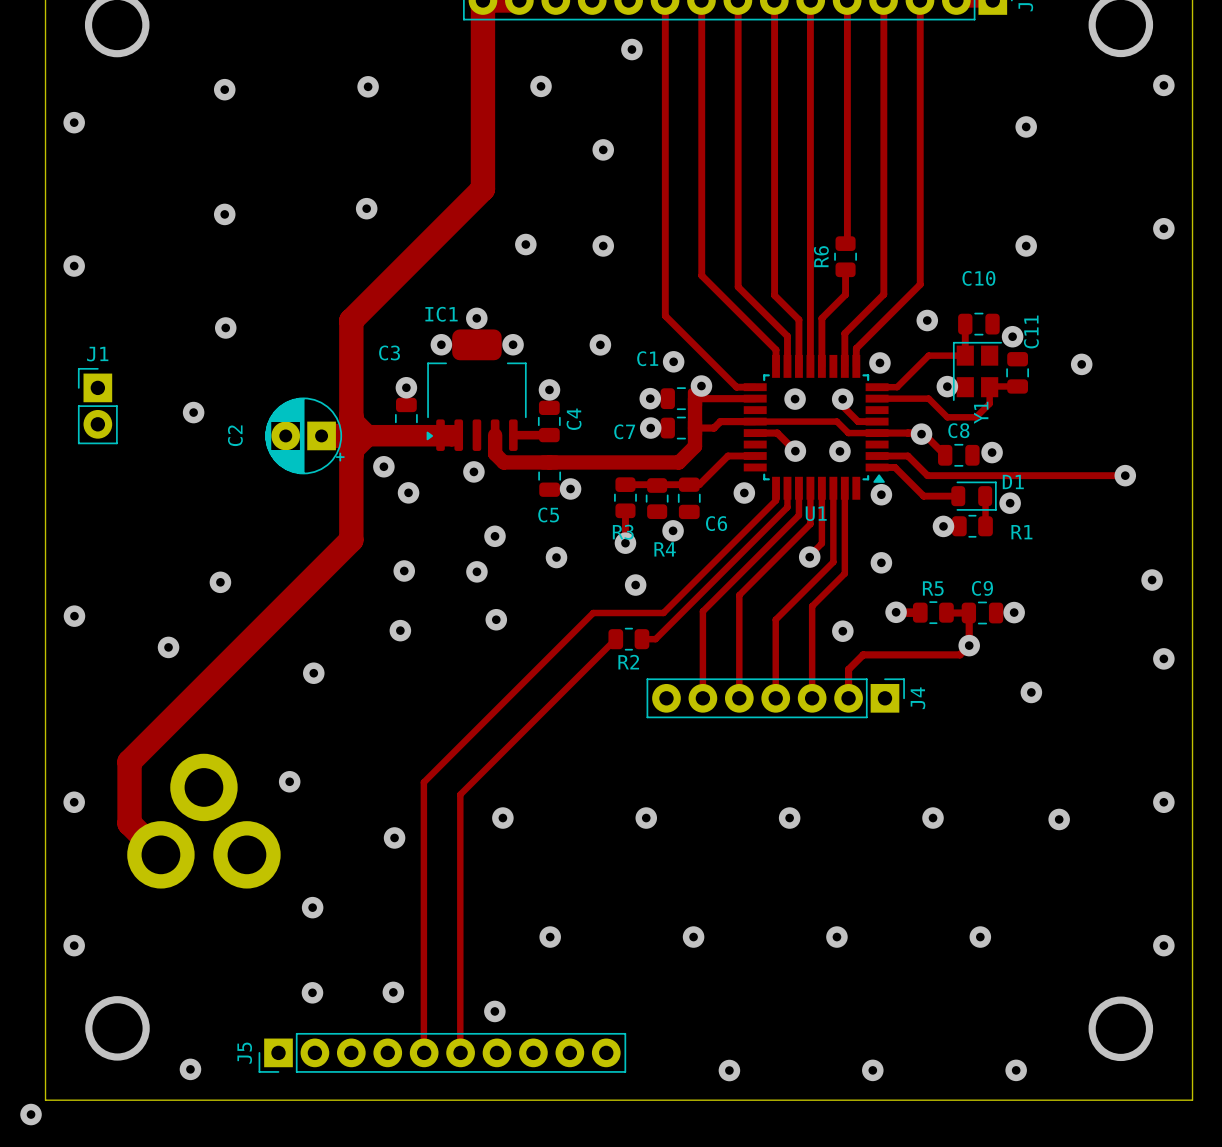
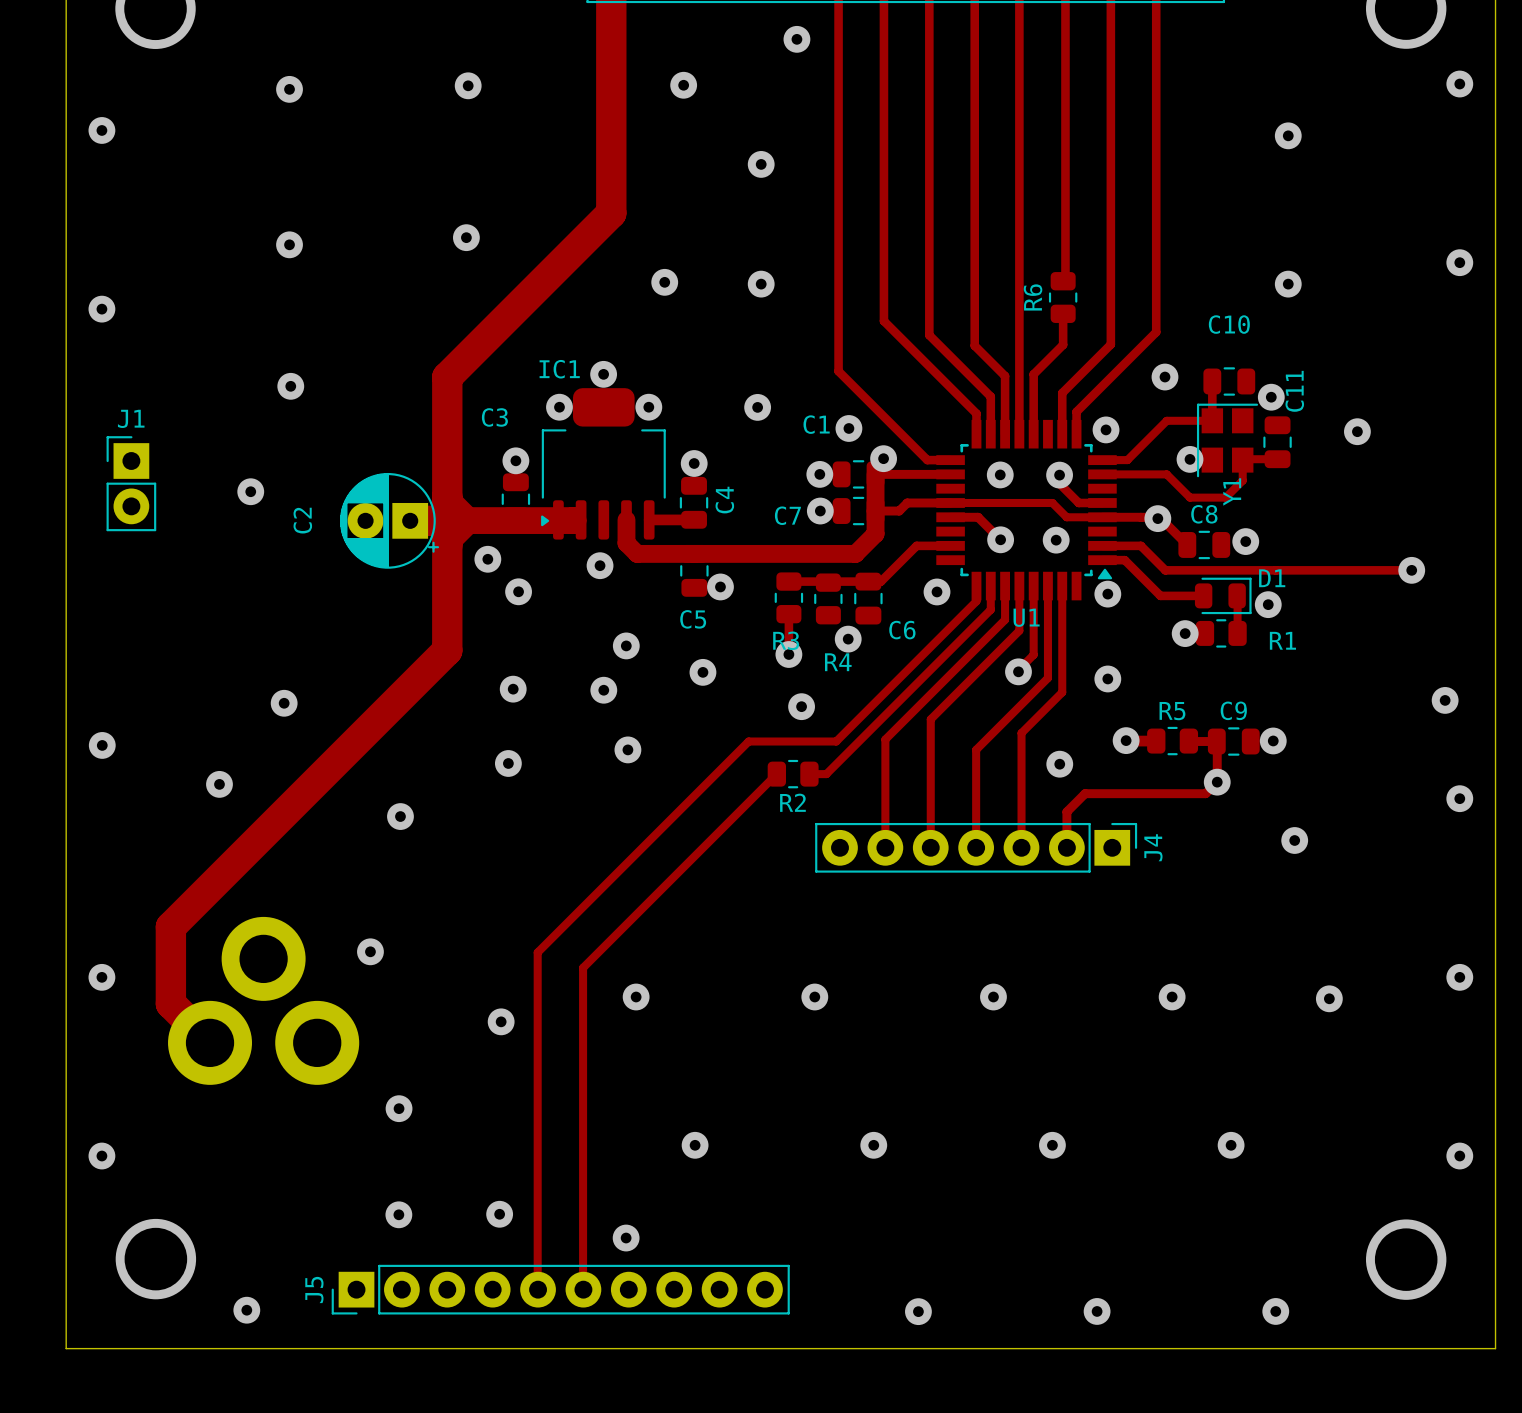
via: (31, 1114) -> none

